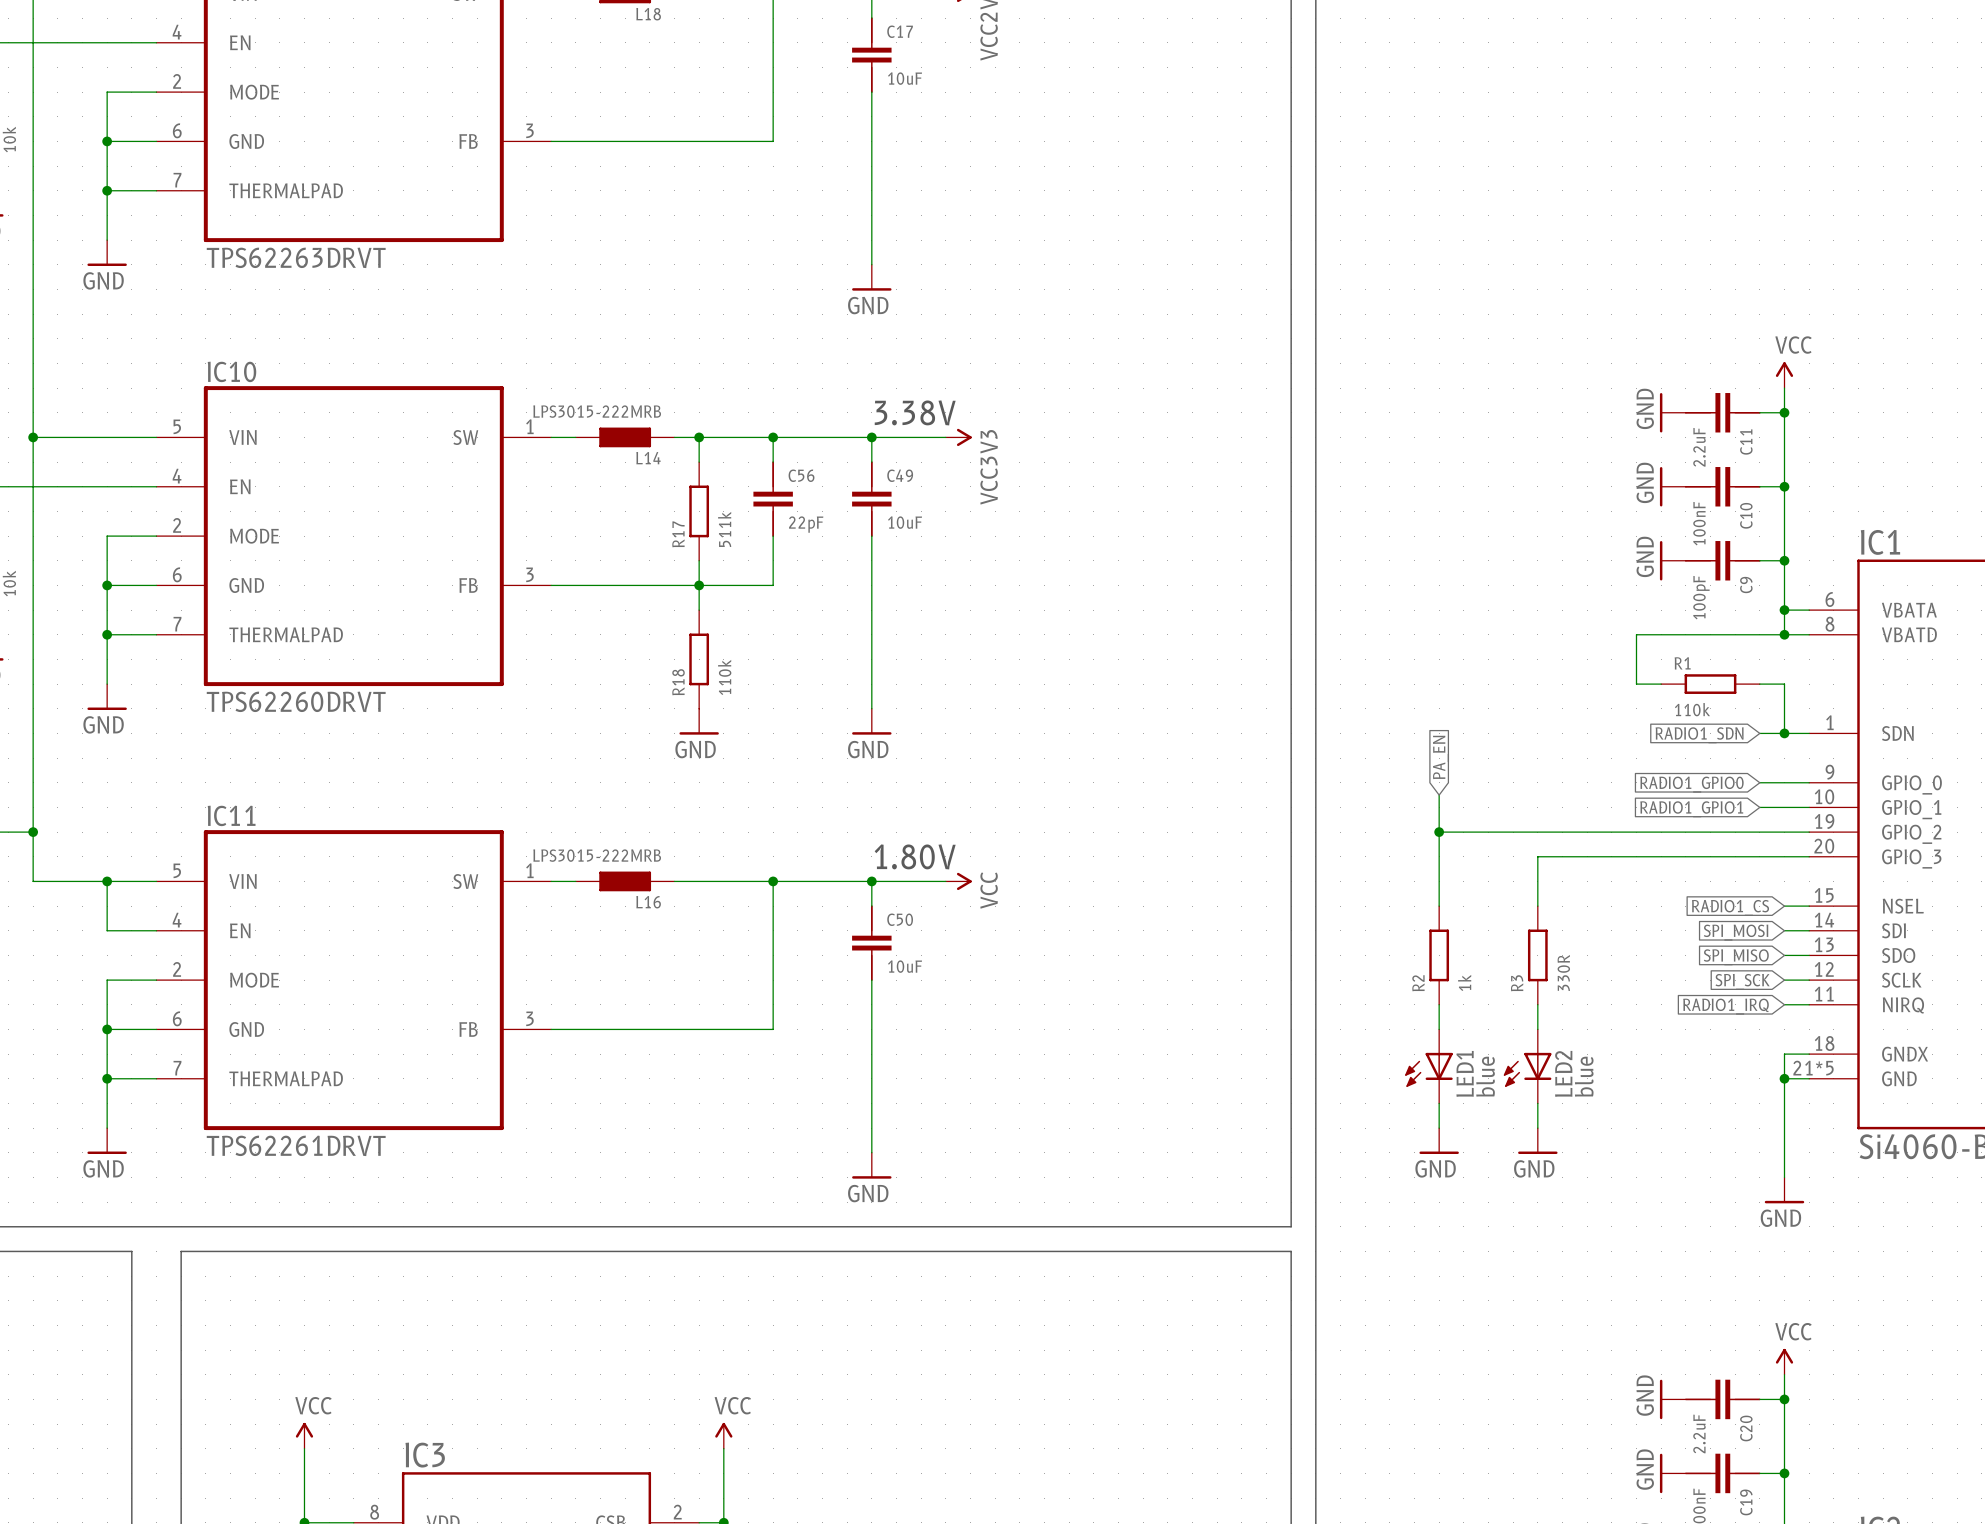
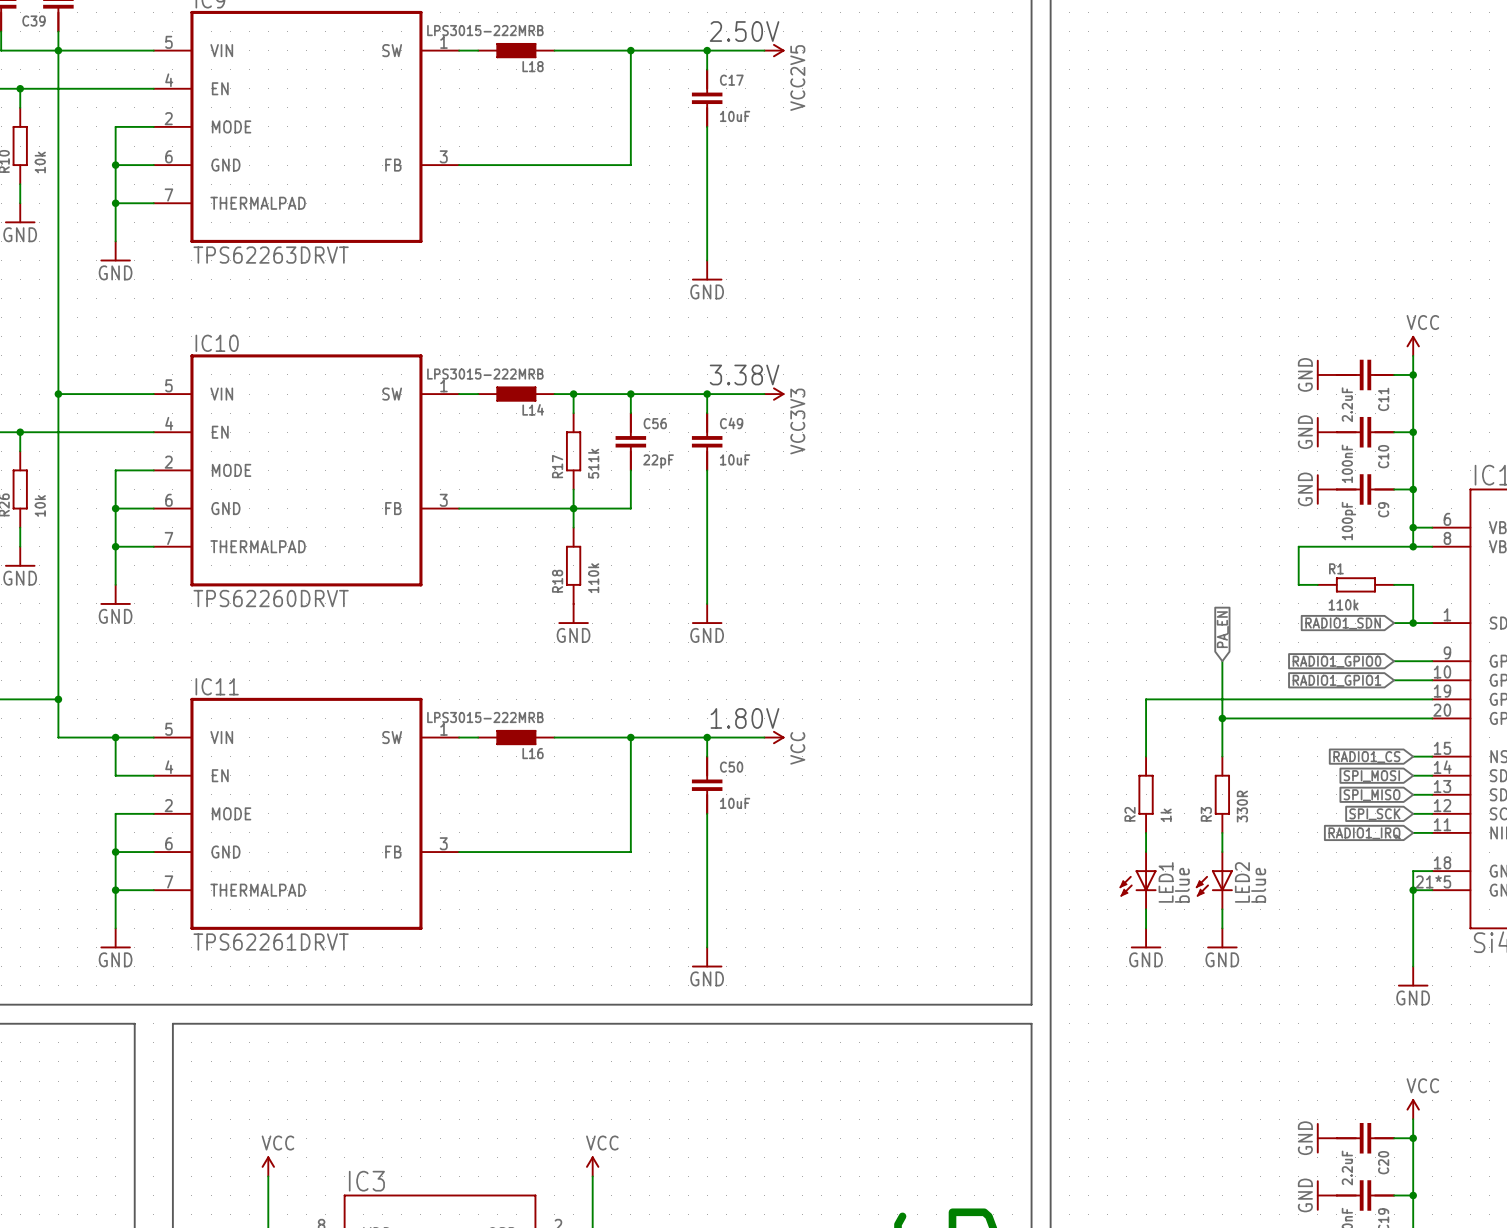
global label position: PA_EN (1441, 757) -> PA_EN (1222, 629)
wire: none -> (1222, 661) (1222, 718)
wire: (1439, 795) (1439, 832) -> none
junction: (1439, 832) -> none
junction: none -> (1222, 718)

